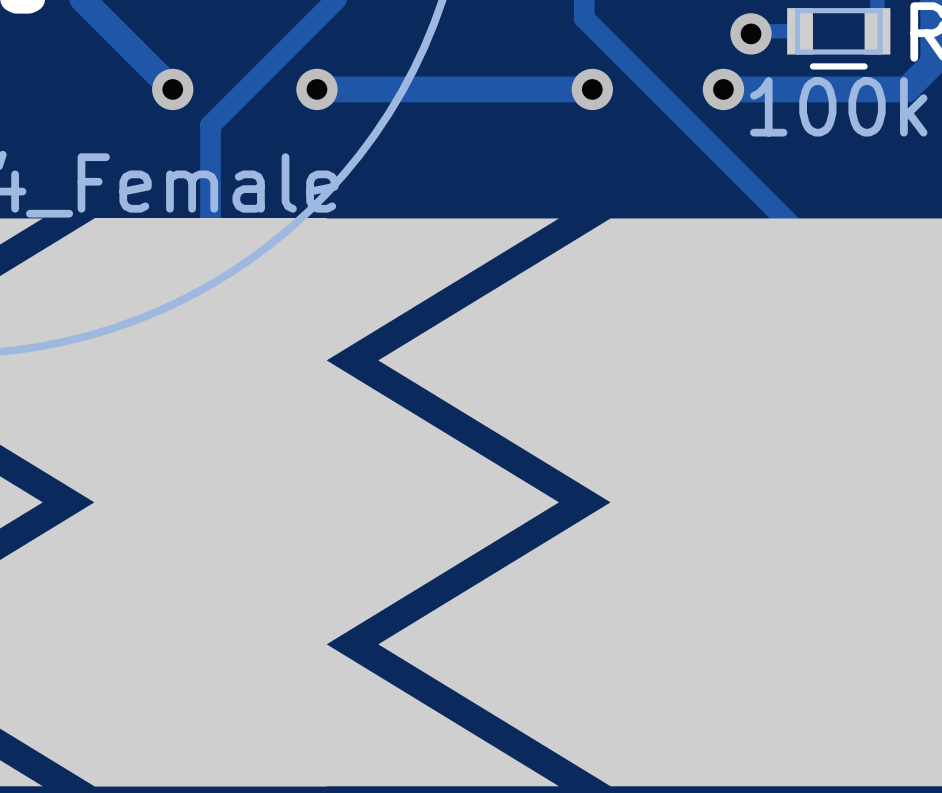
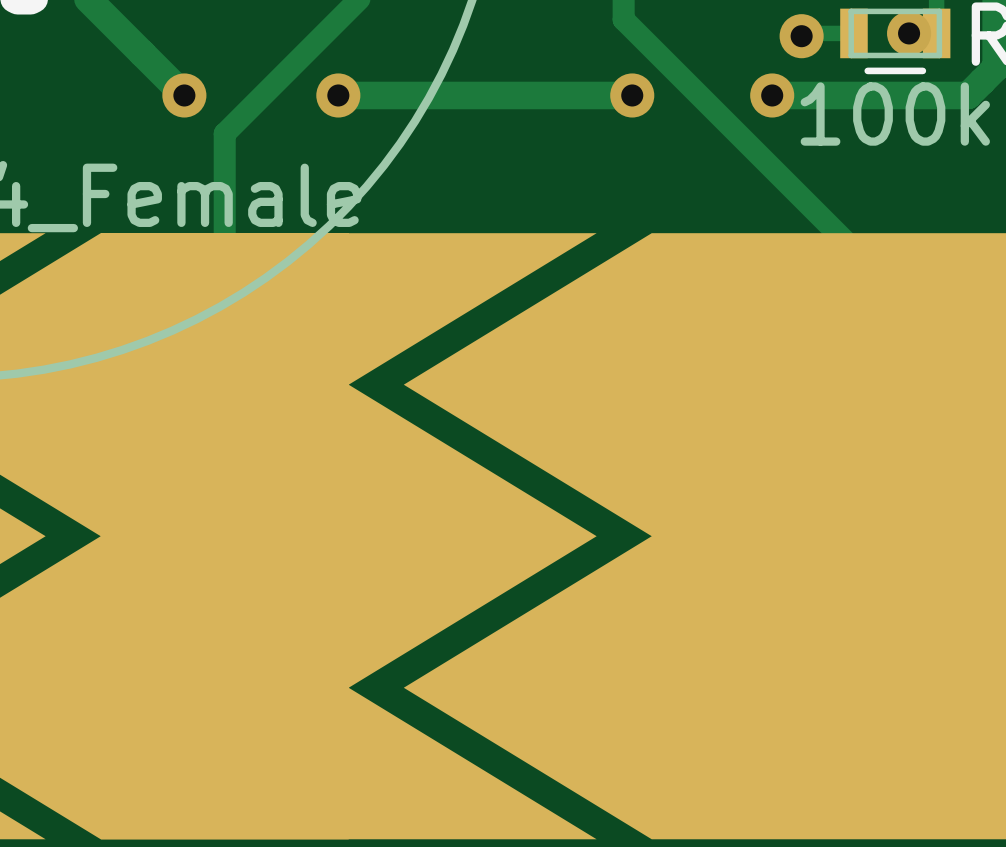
via: none -> (909, 33)

